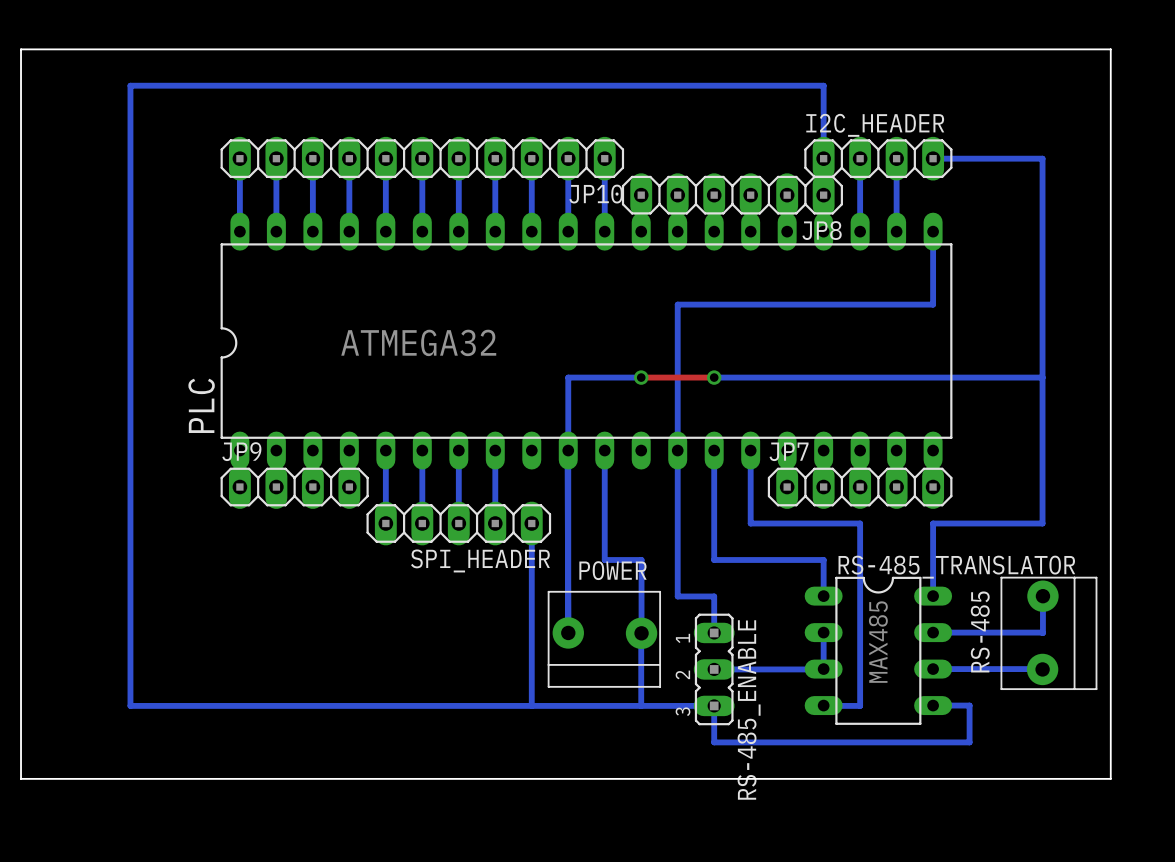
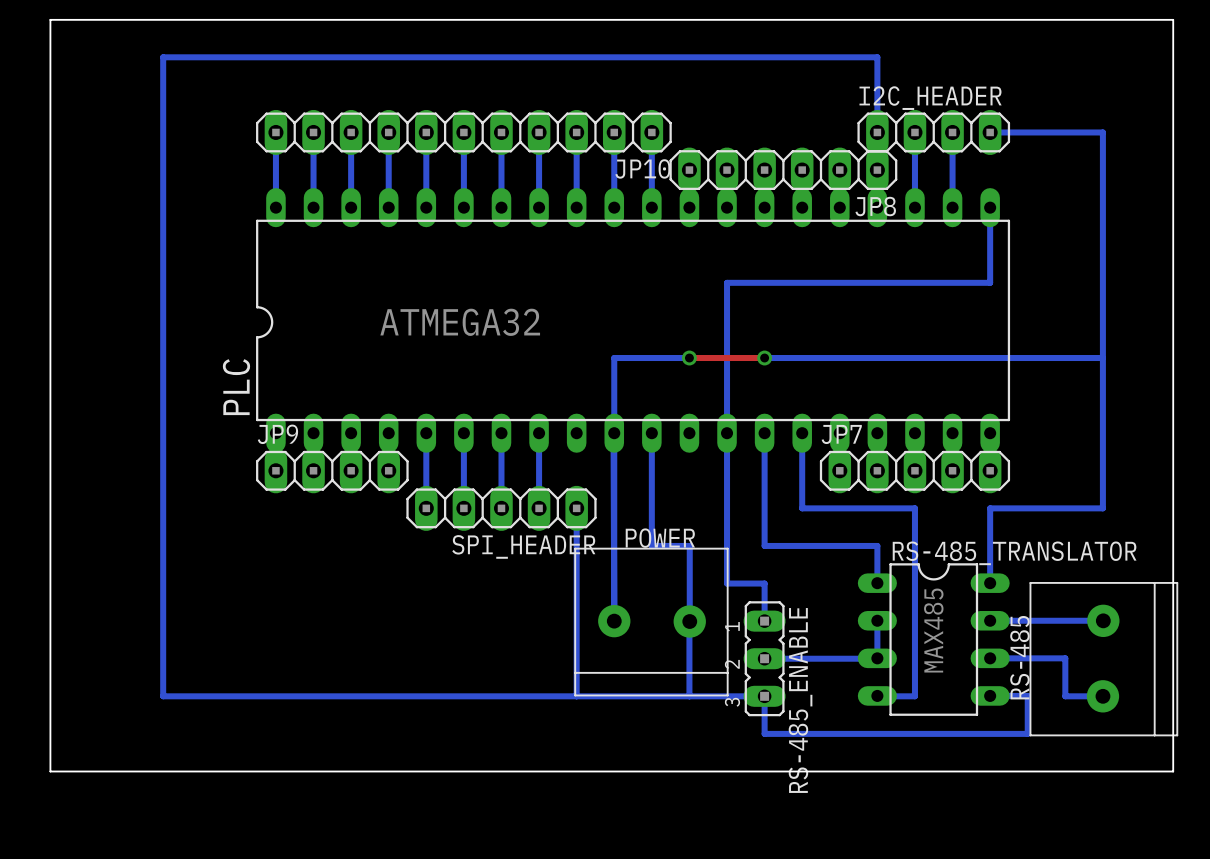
RS-485 footprint: [1000, 576, 1098, 691] -> [1029, 581, 1179, 737]
POWER footprint: [547, 590, 662, 688] -> [574, 547, 729, 697]
bottom track: (1042, 596) (1042, 632) -> none
bottom track: (1006, 669) (1042, 669) -> (1065, 658) (1065, 696) (1102, 696)

